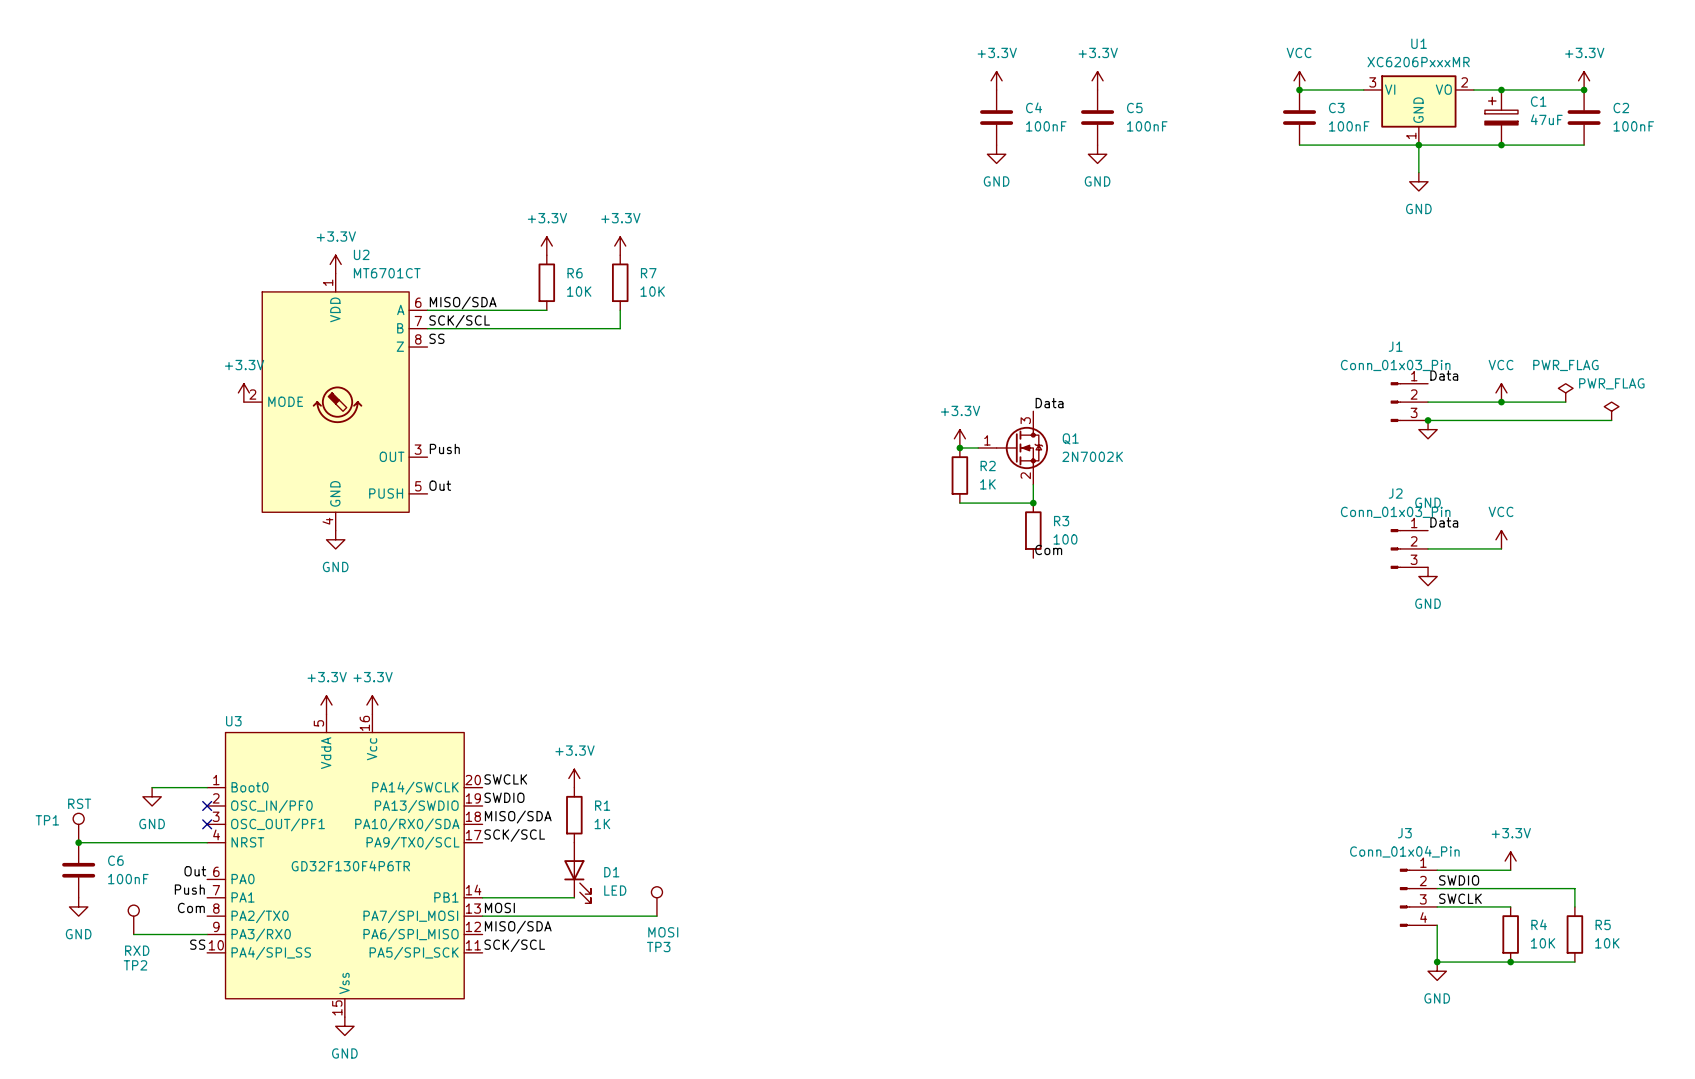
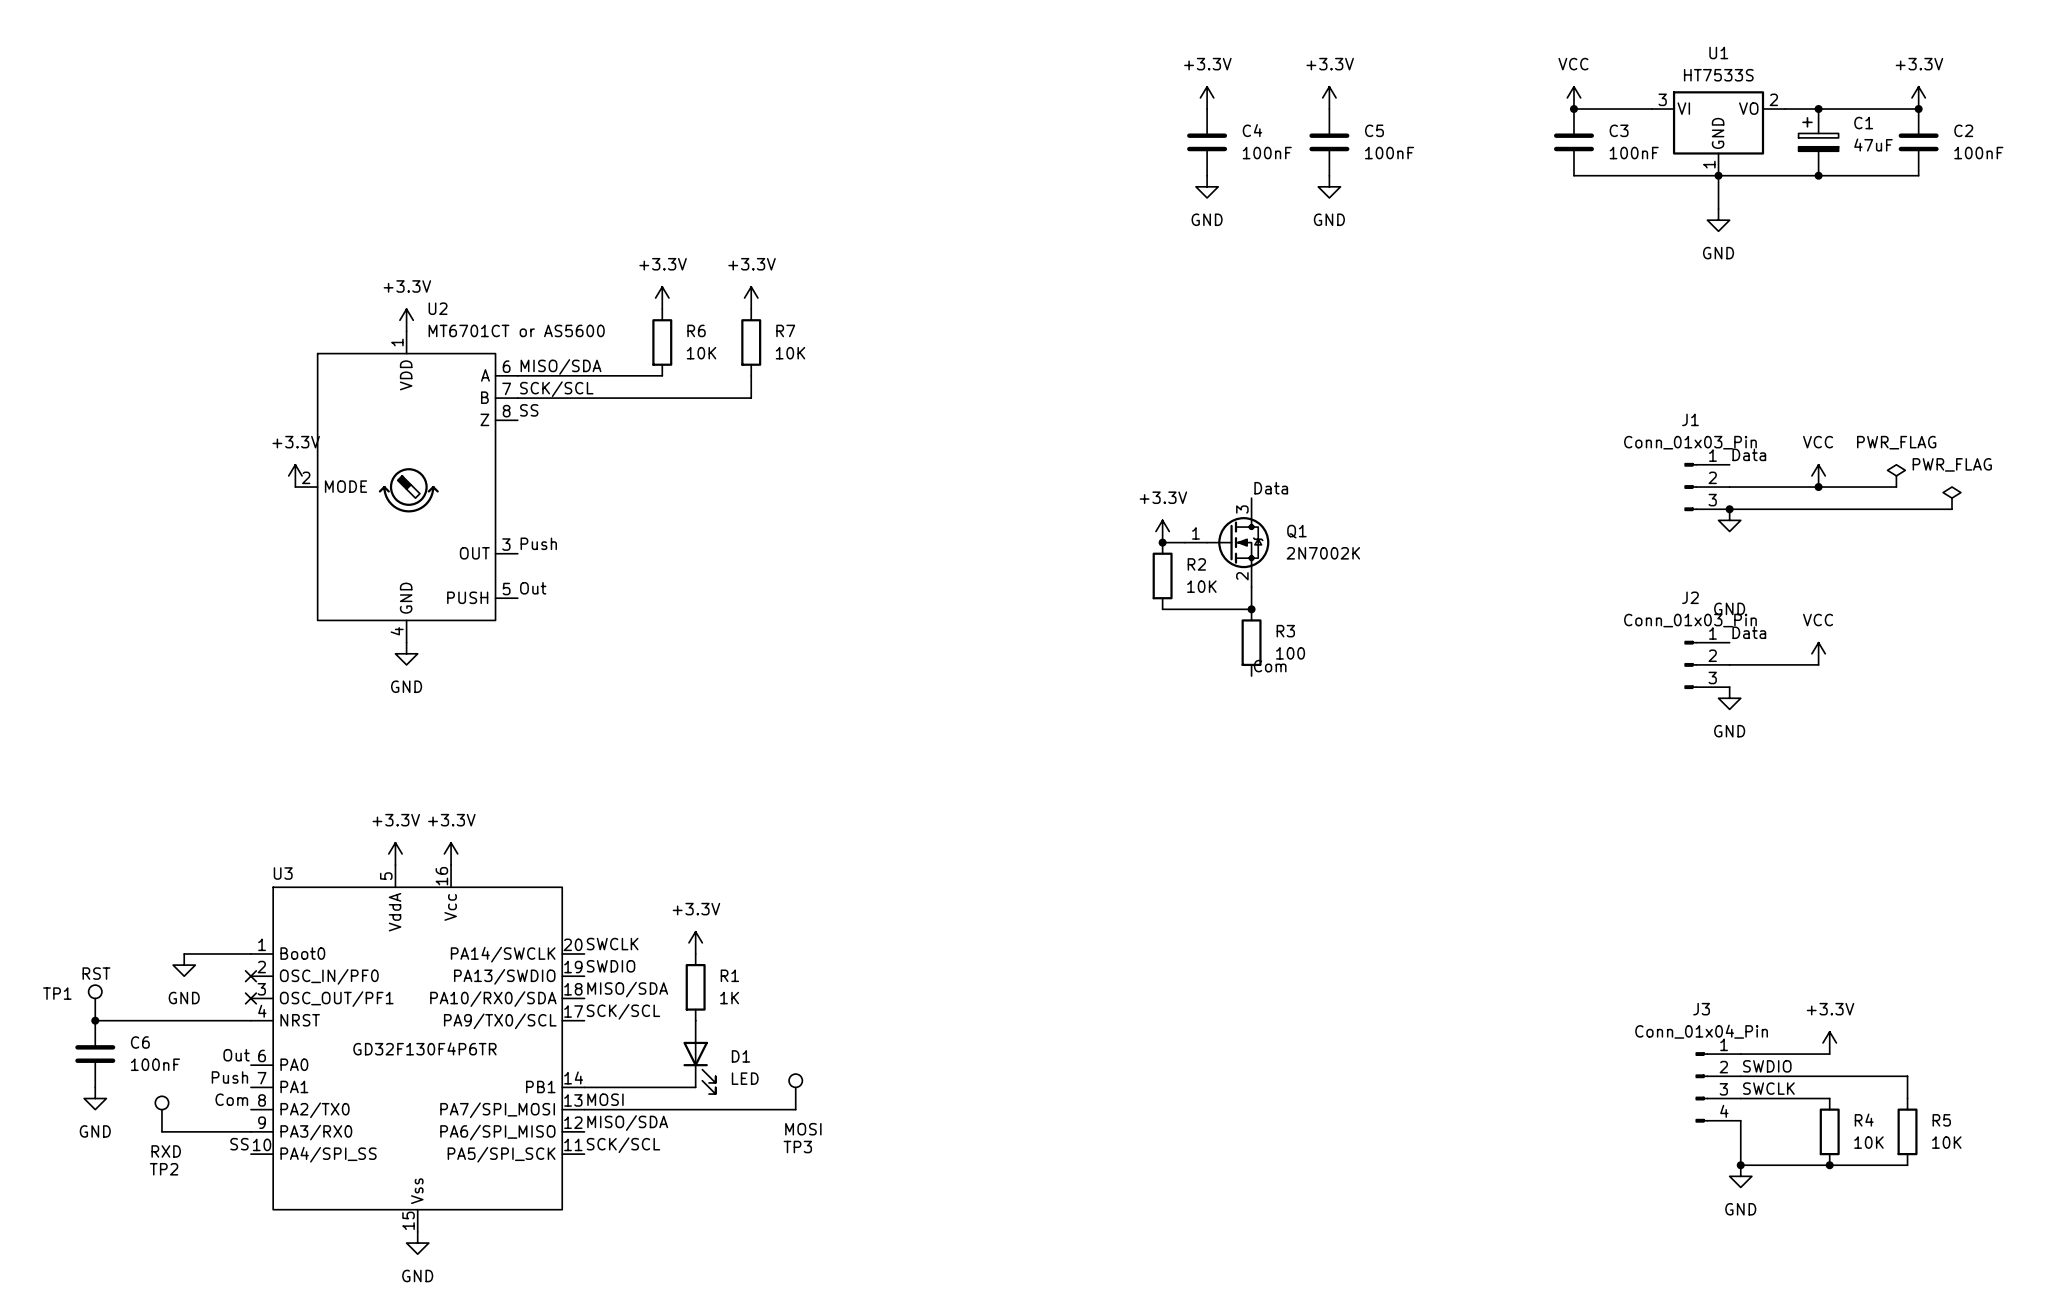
U1 value: XC6206PxxxMR (1418, 62) -> HT7533S (1718, 75)
U2 value: MT6701CT (387, 273) -> MT6701CT or AS5600 (516, 330)
R2 value: 1K (987, 484) -> 10K (1201, 586)

